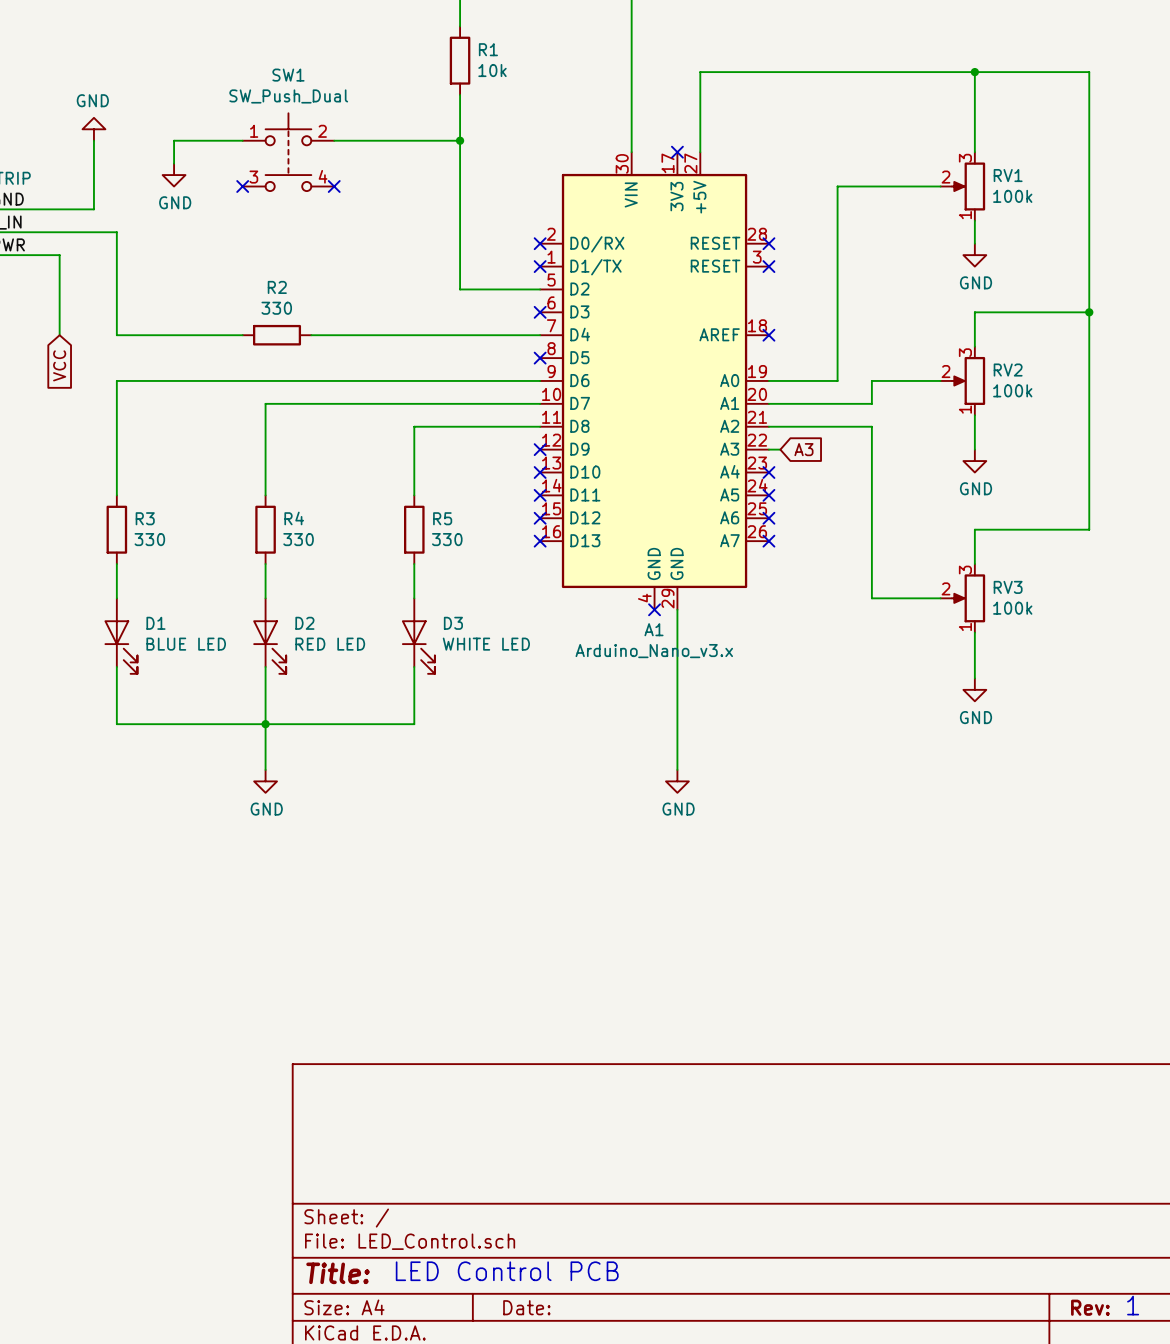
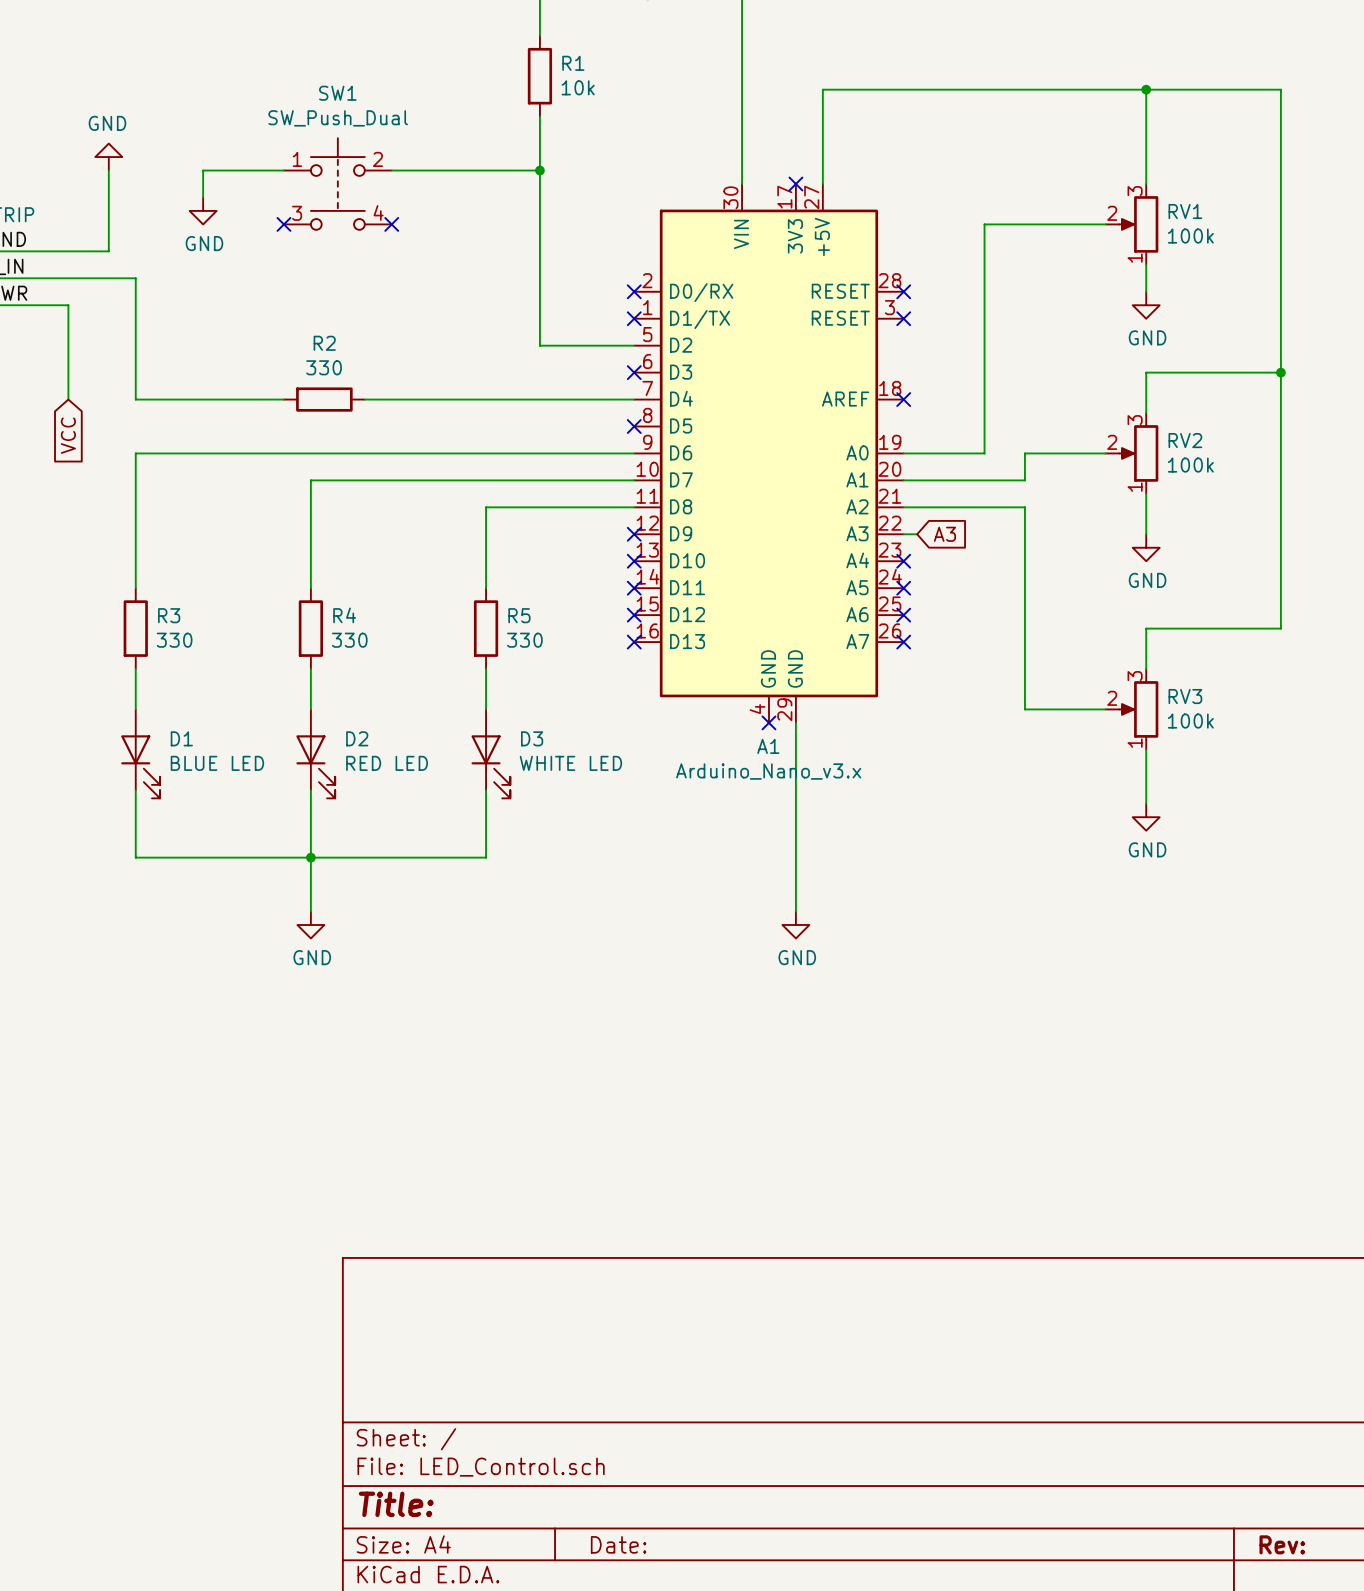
text: LED Control PCB (507, 1271) -> none
text: 1 (1133, 1305) -> none

